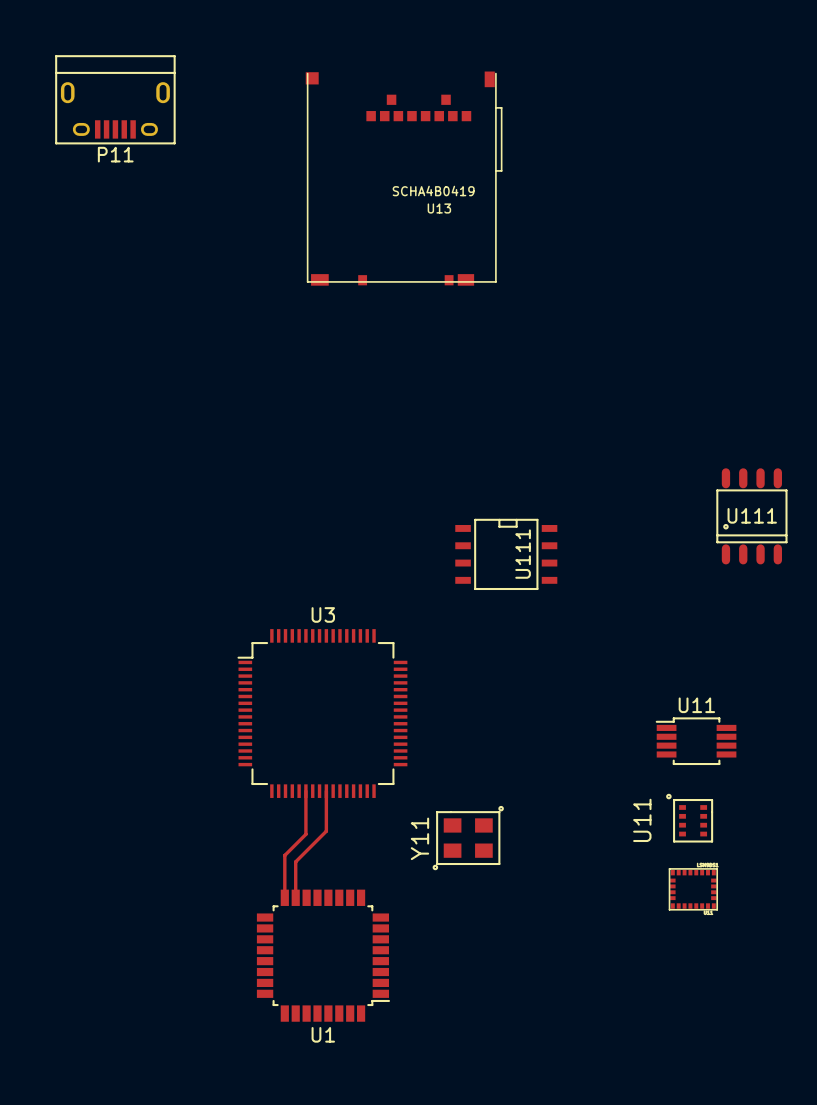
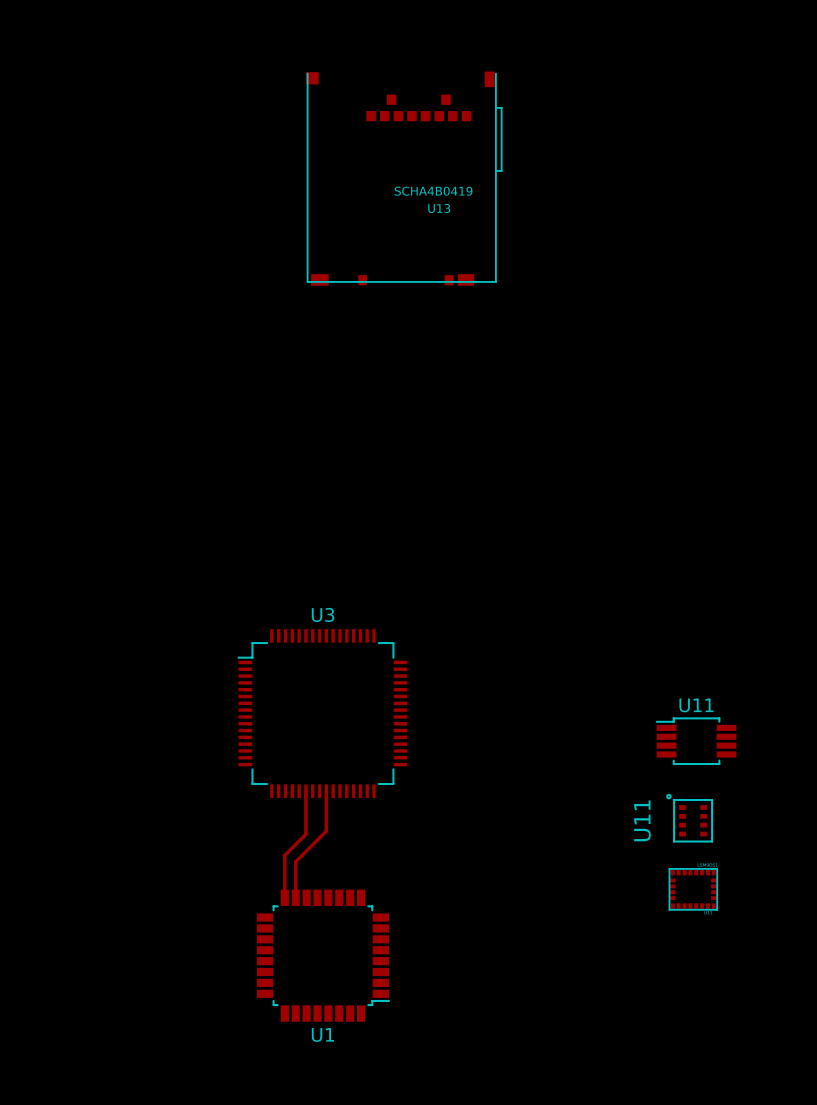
P11: (115, 99) -> none
U111: (751, 516) -> none
U111: (506, 554) -> none
Y11: (468, 838) -> none

